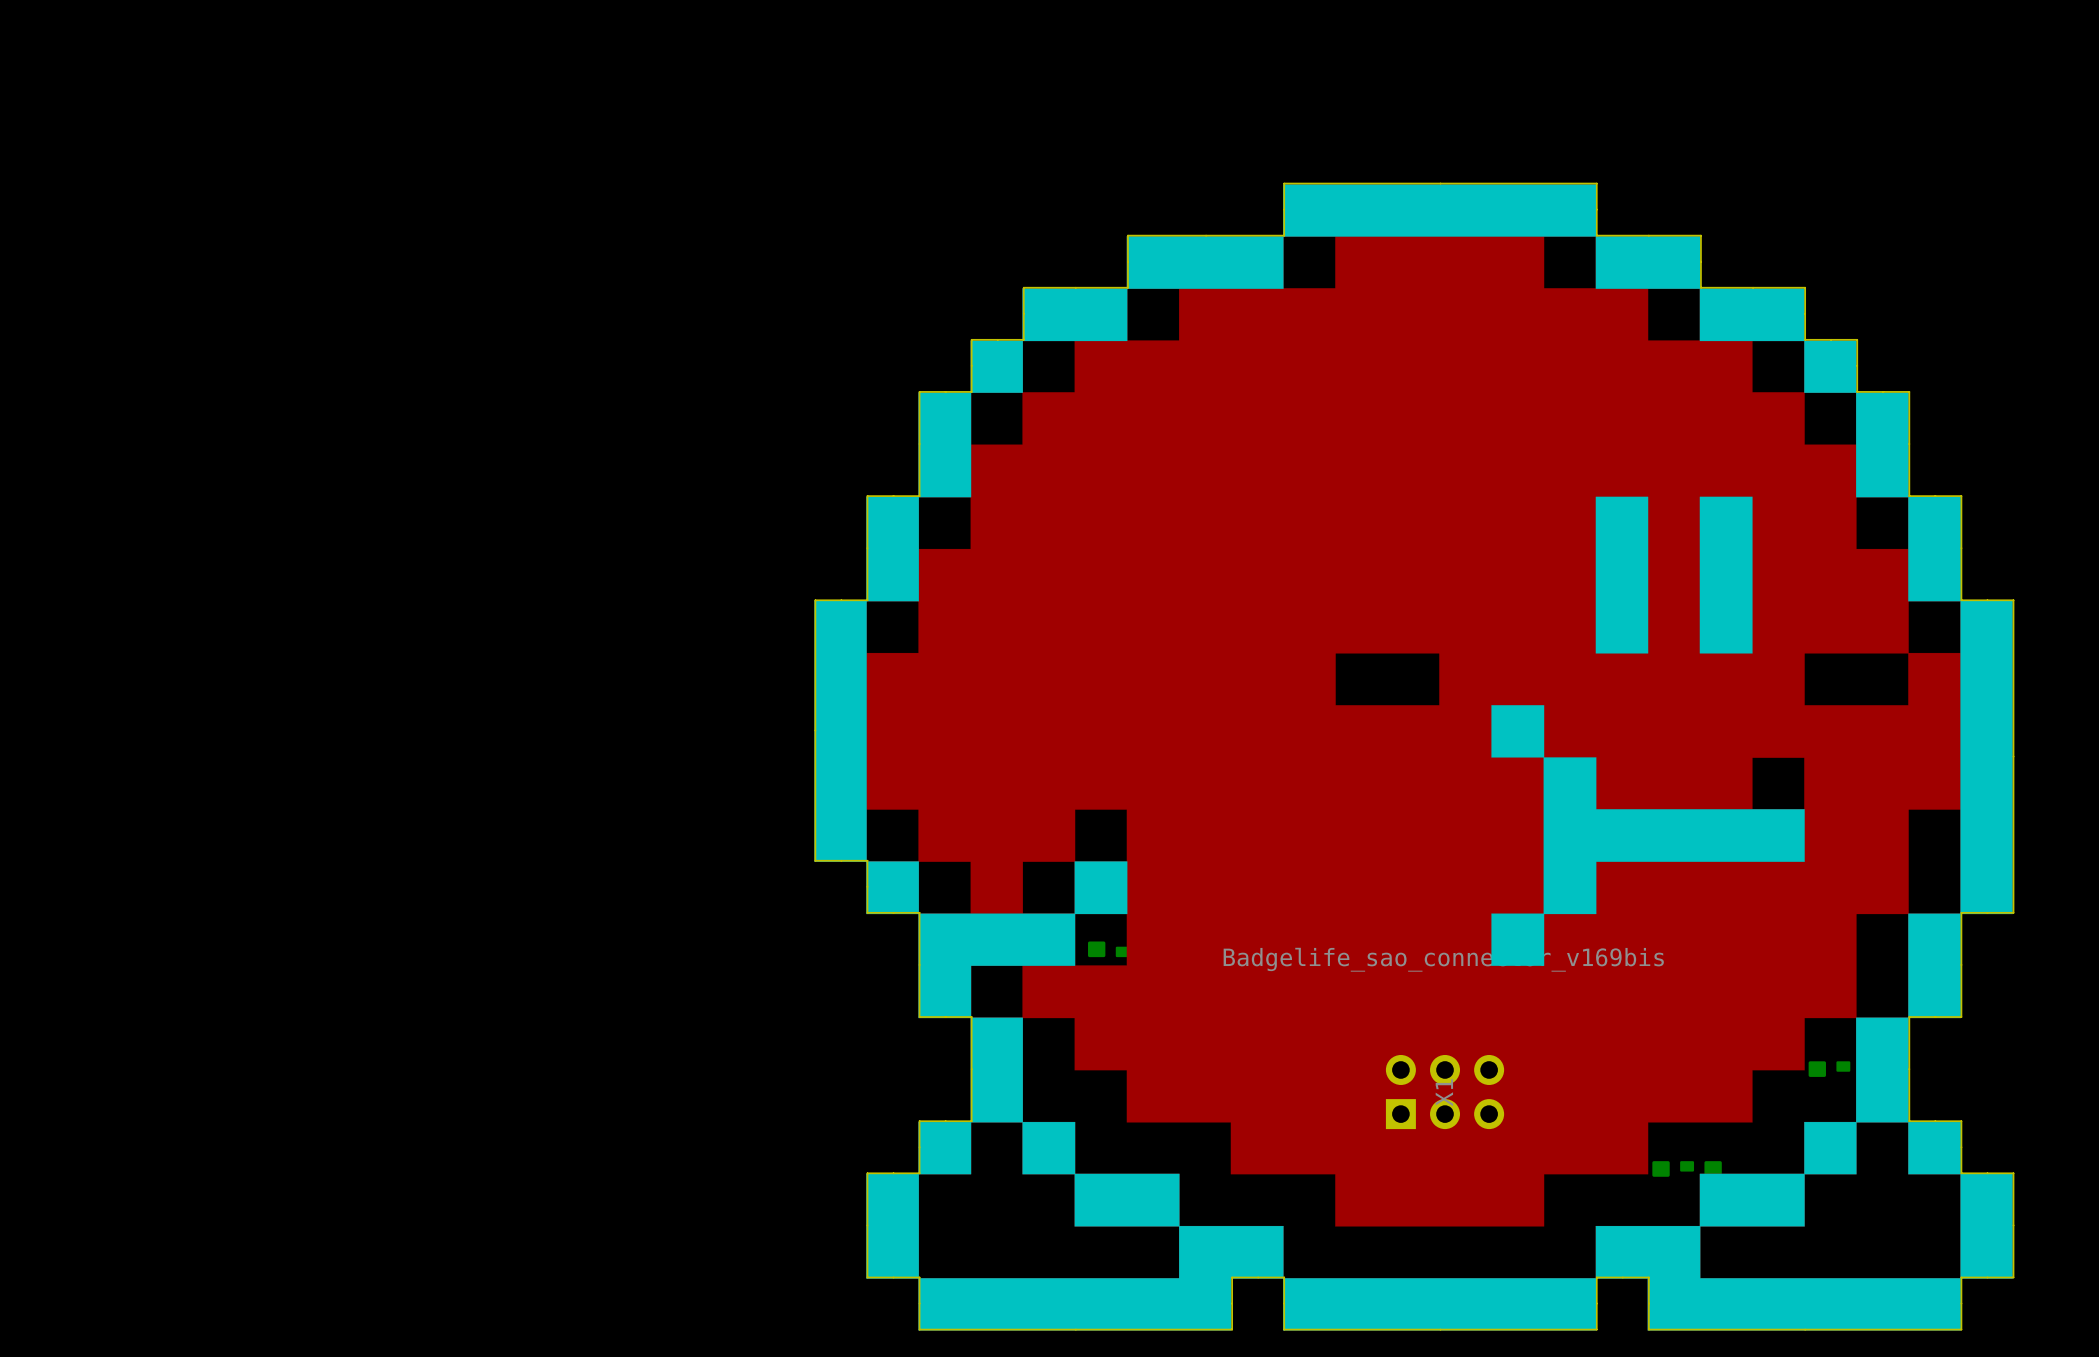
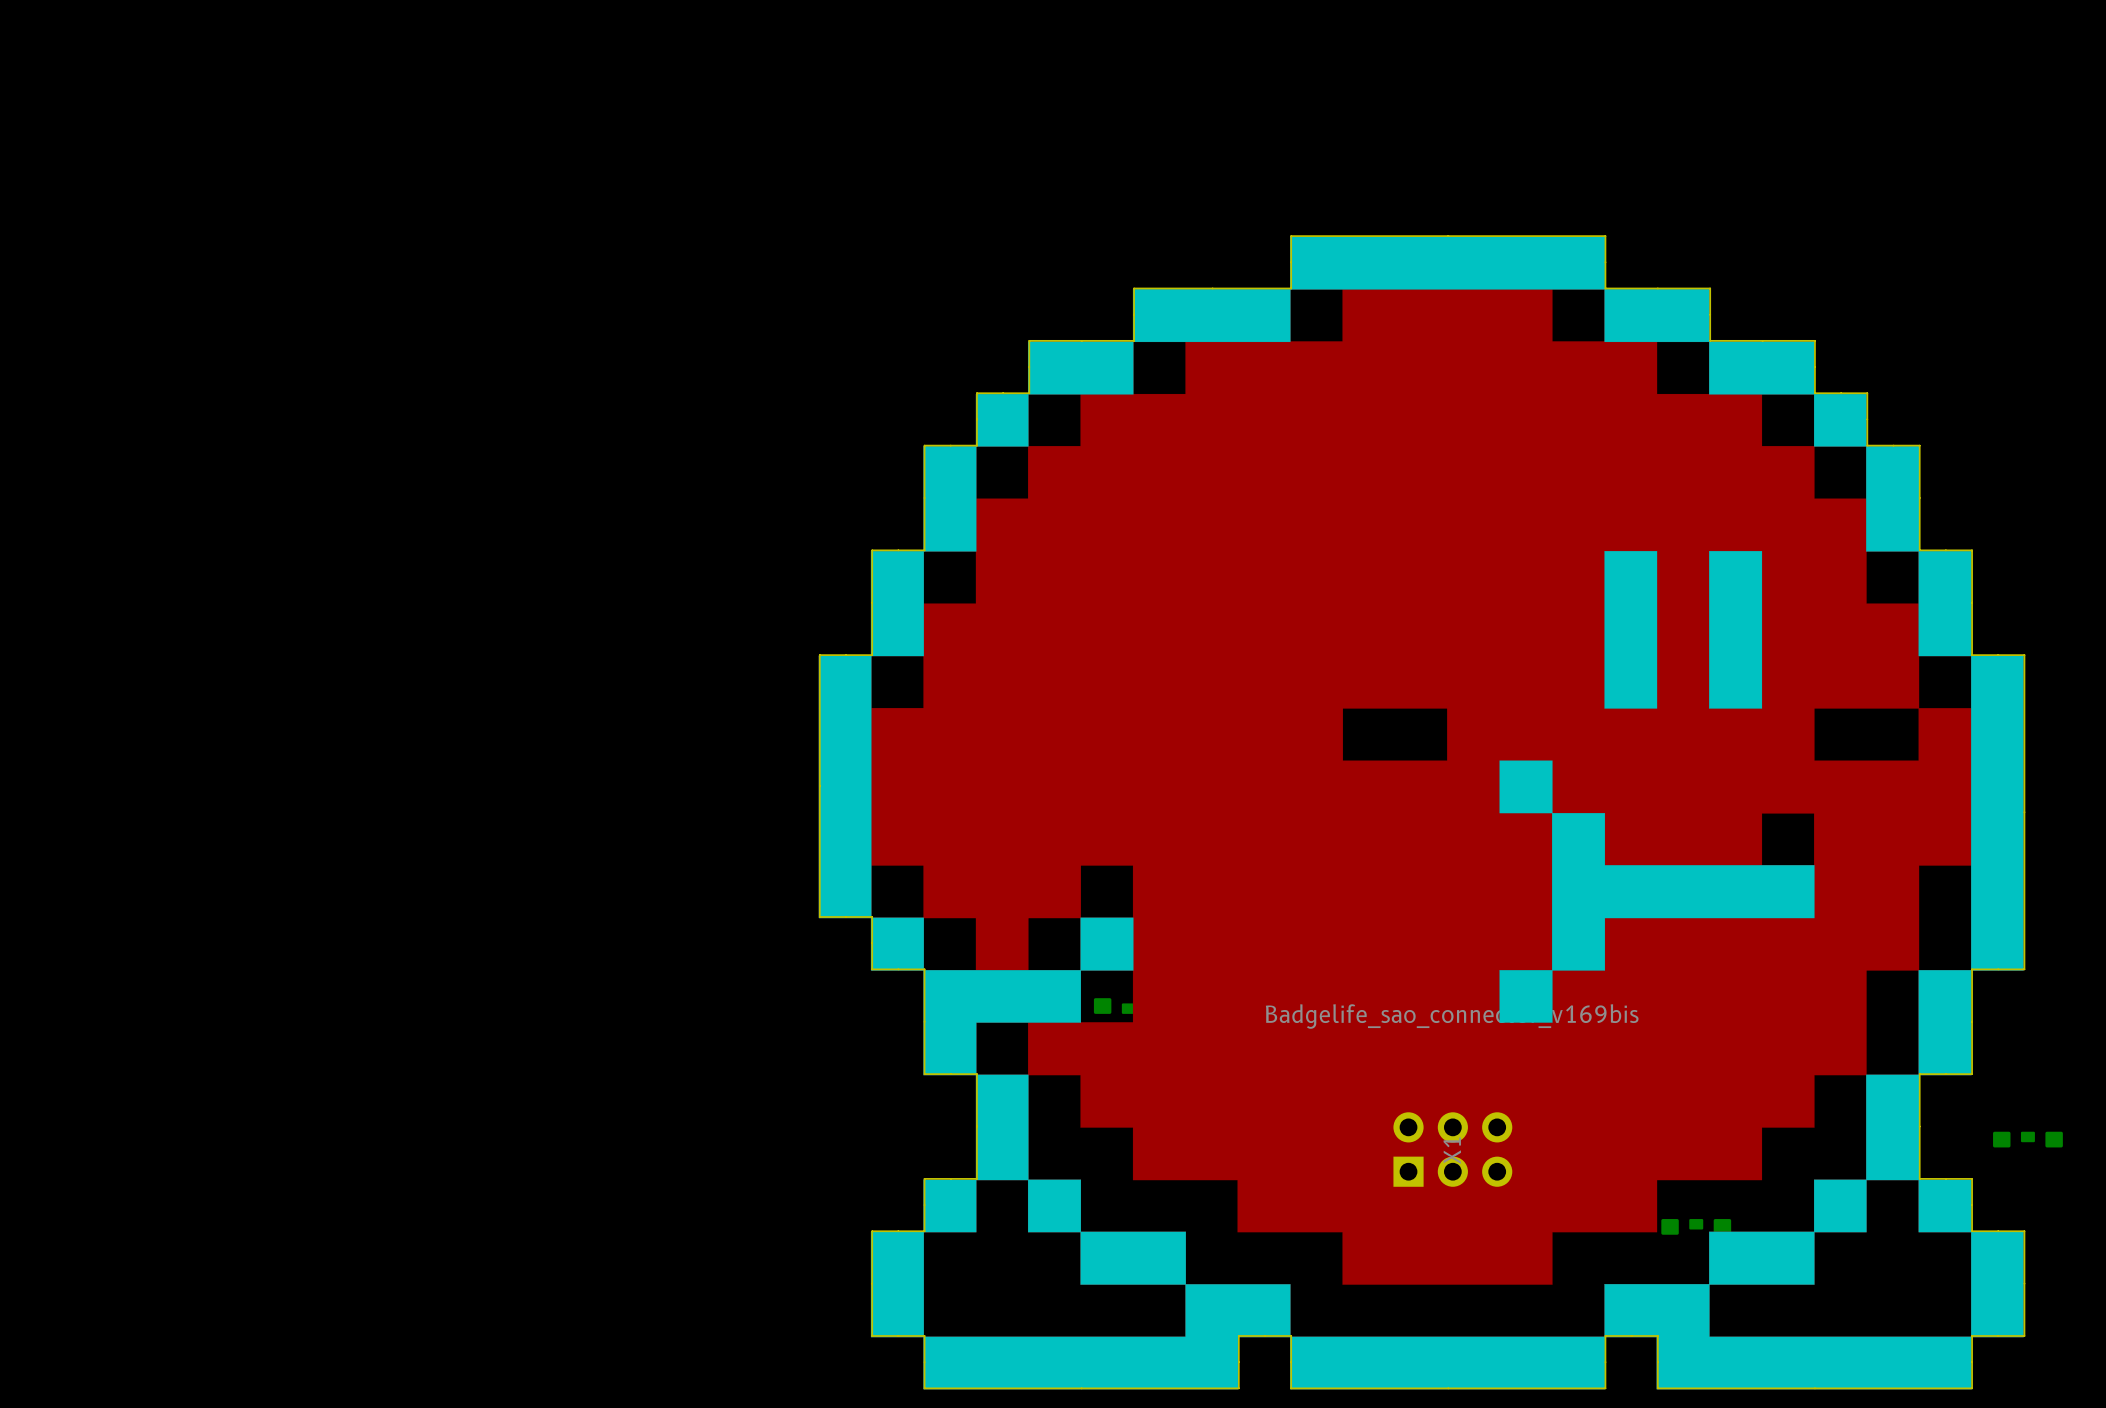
part position: (1843, 1069) -> (2027, 1139)

